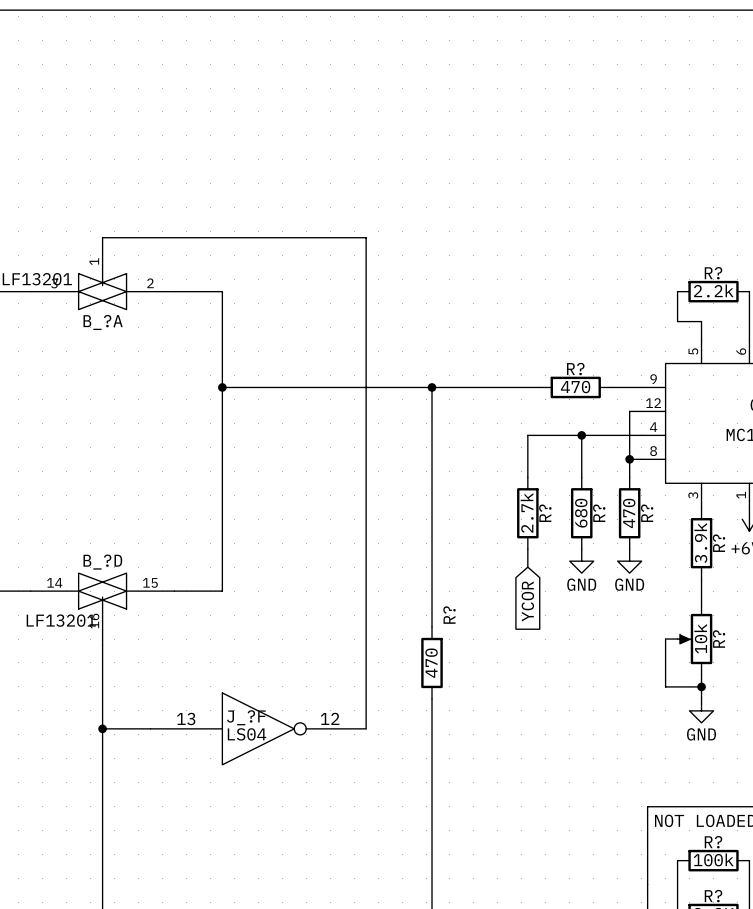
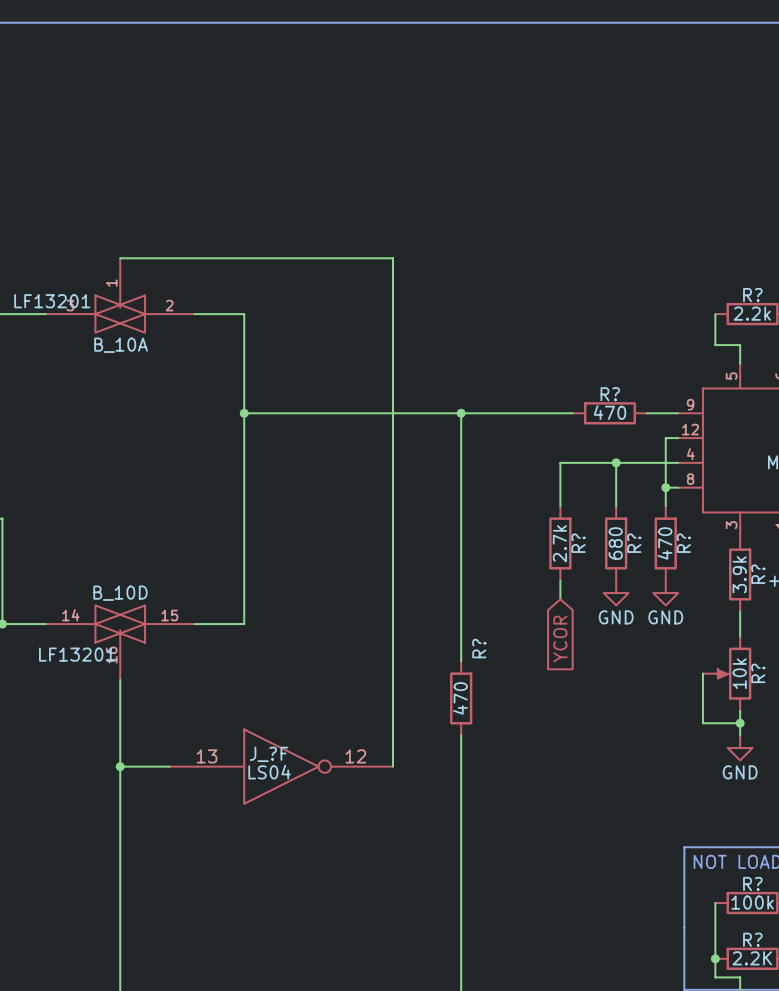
B_?A name: B_?A (103, 322) -> B_10A (121, 345)
B_?D name: B_?D (102, 562) -> B_10D (120, 593)

